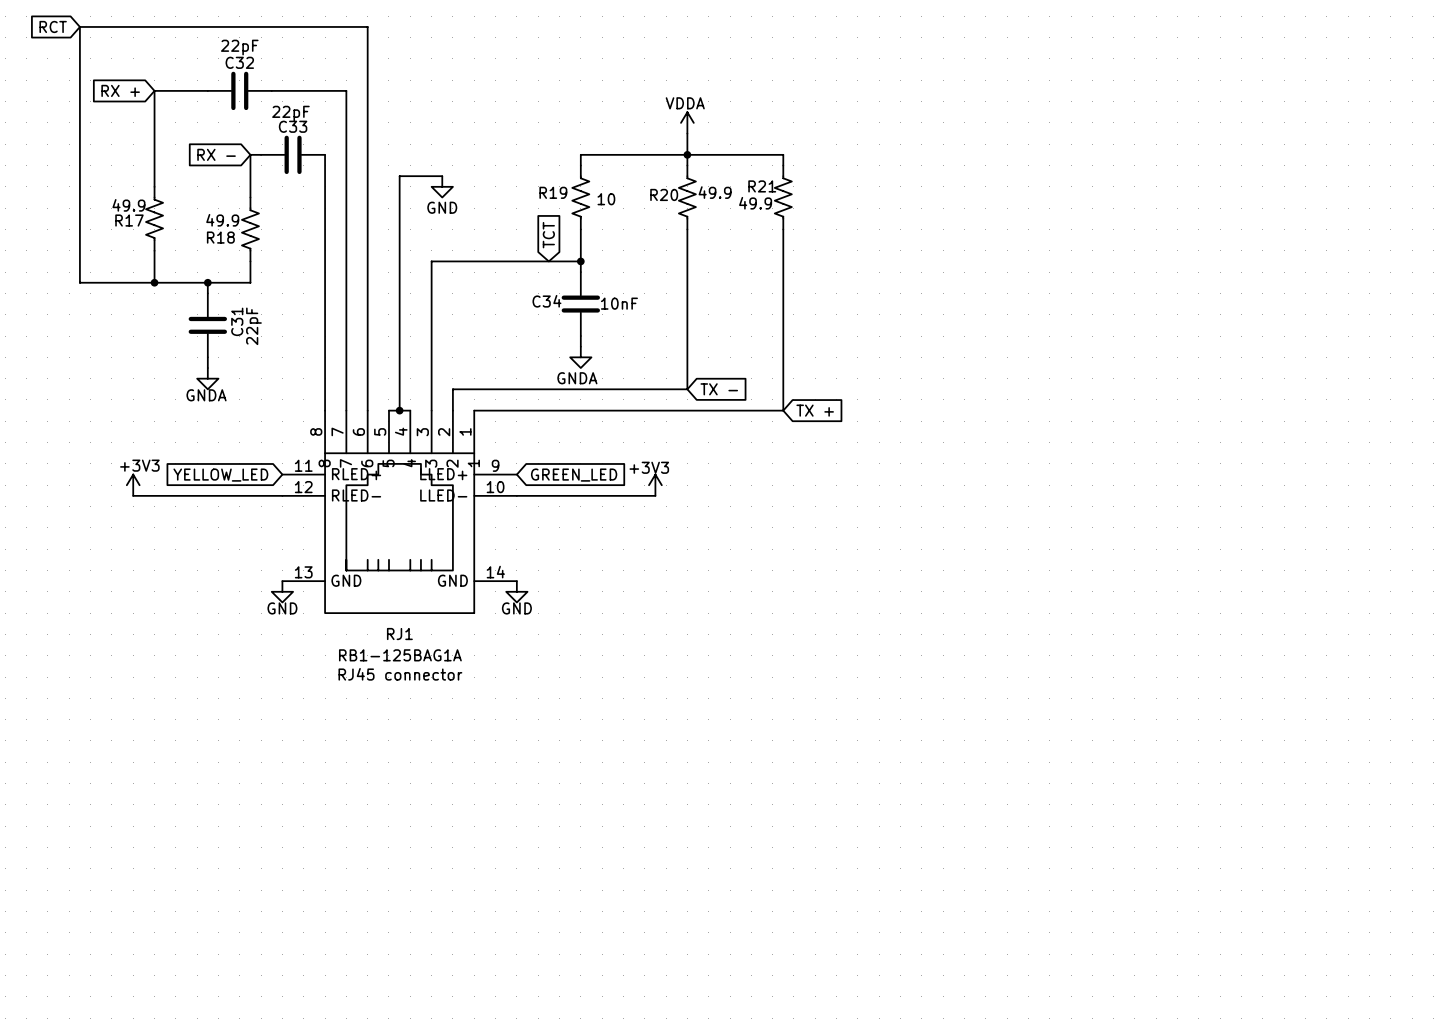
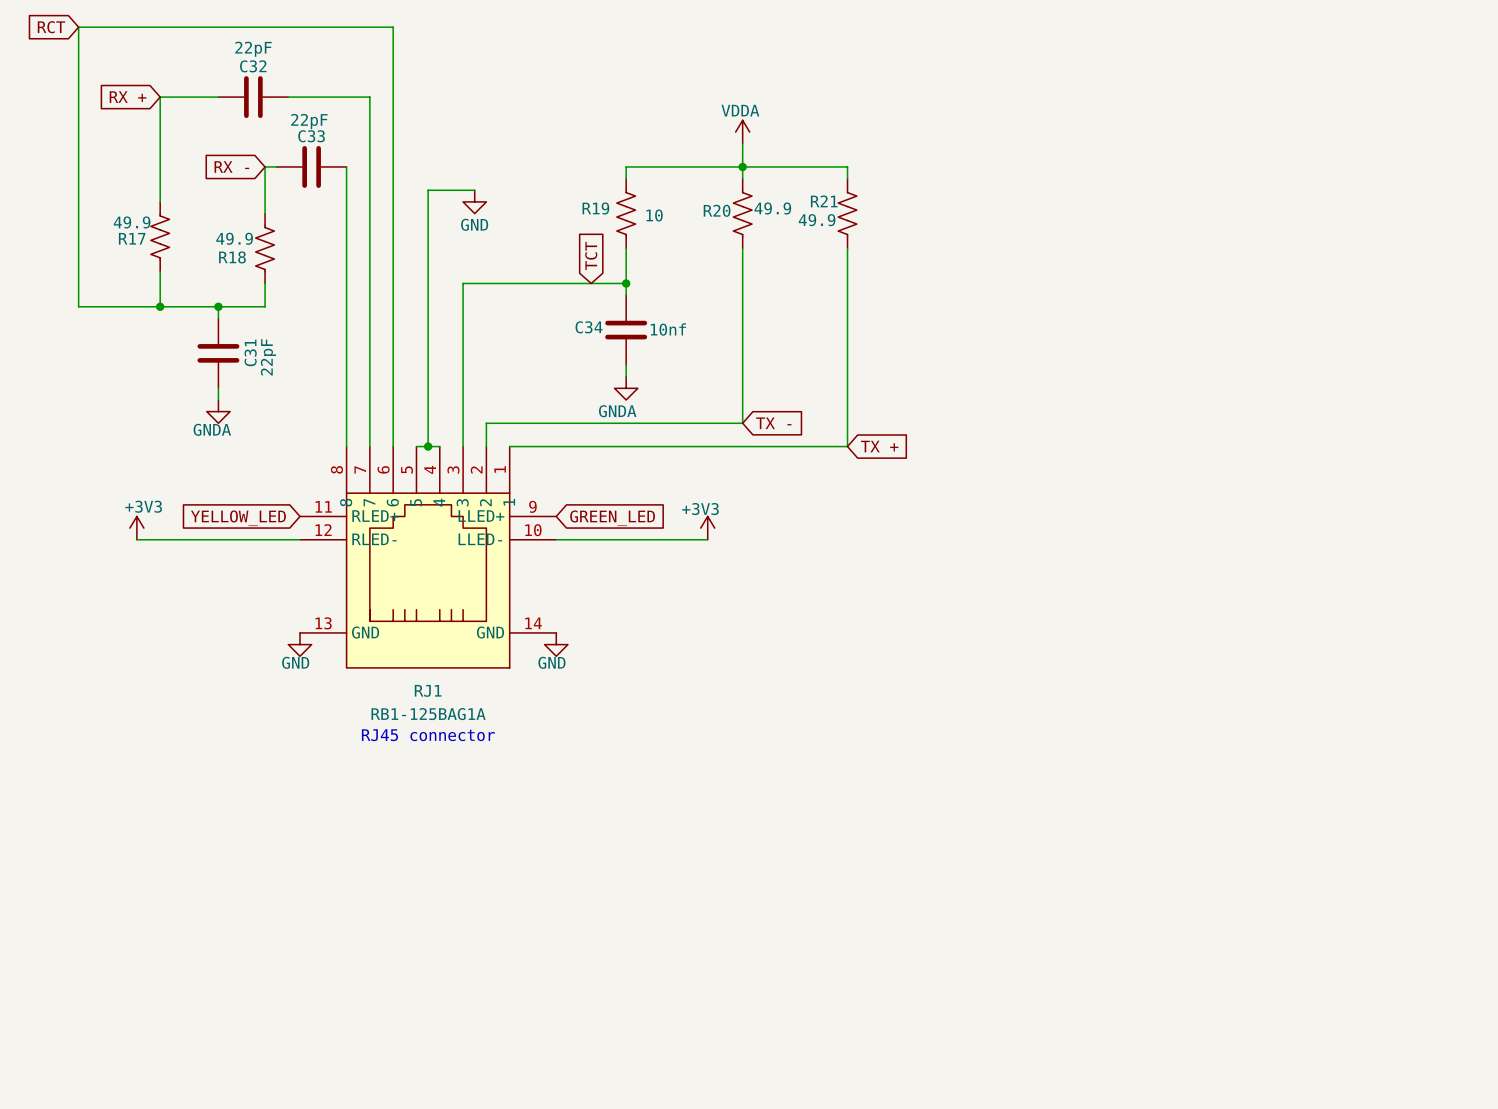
C34 value: 10nF (619, 303) -> 10nf (668, 329)

